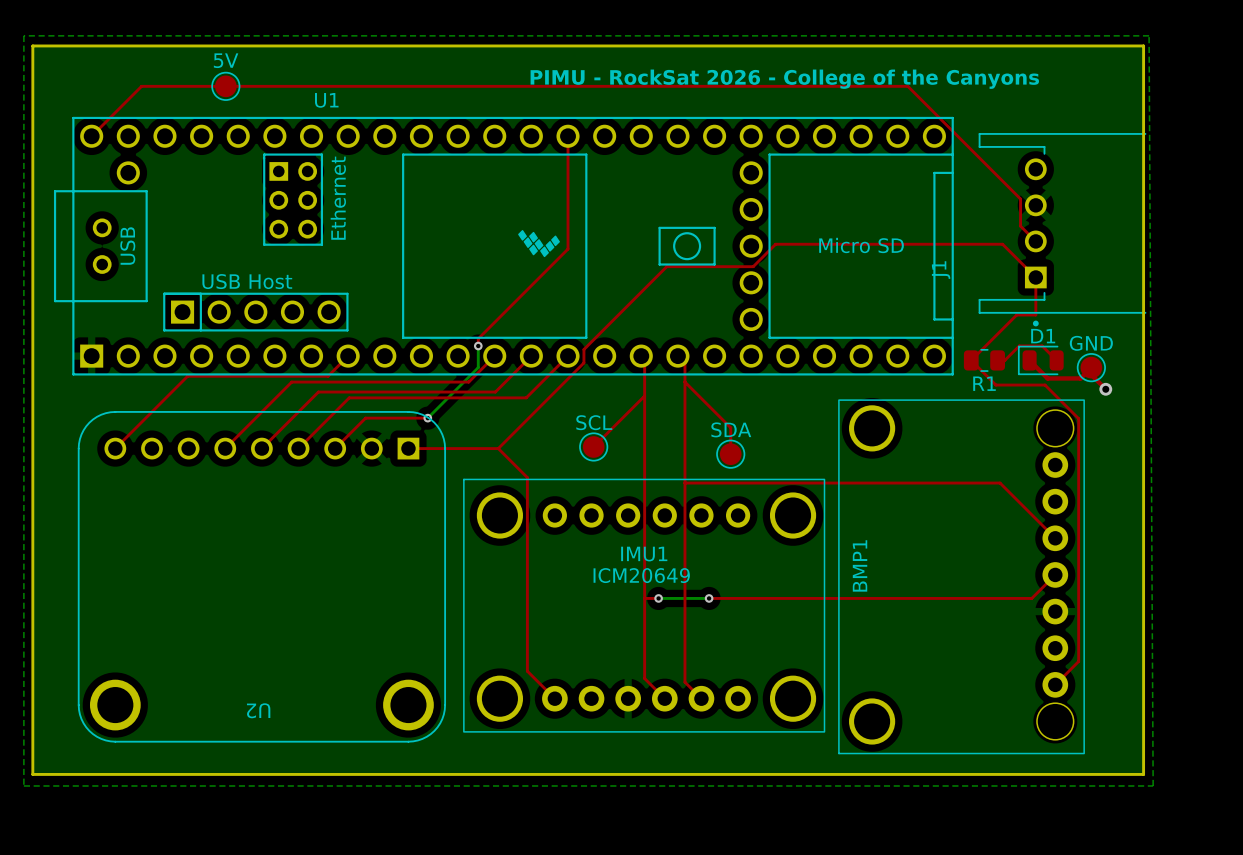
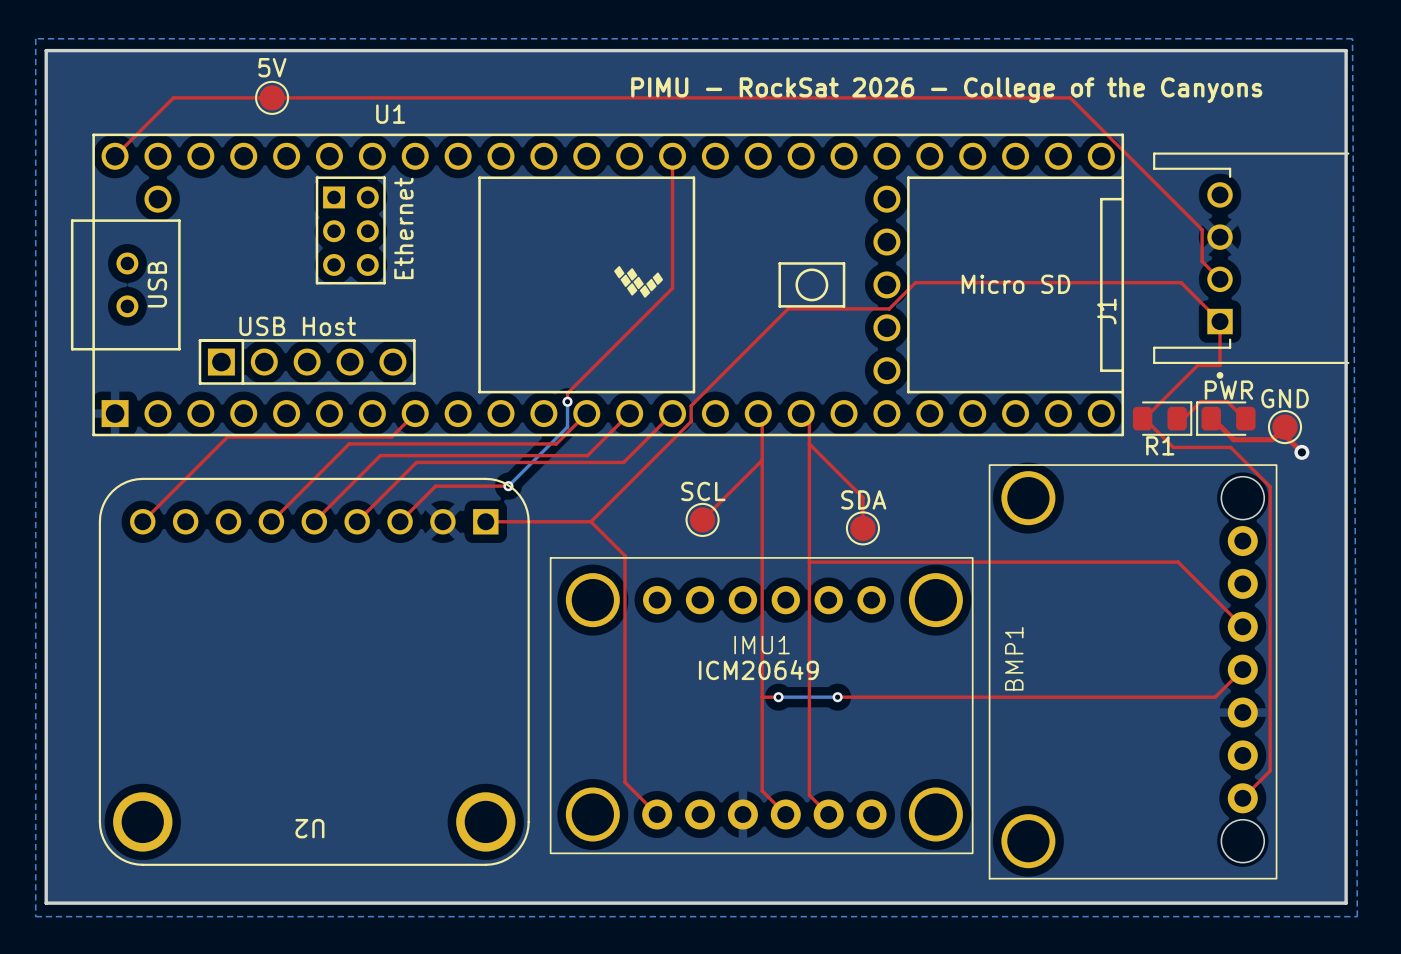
R1 footprint: [963, 348, 1005, 372] -> [1132, 401, 1193, 436]
D1: (1040, 360) -> none
PWR: none -> (1225, 418)

